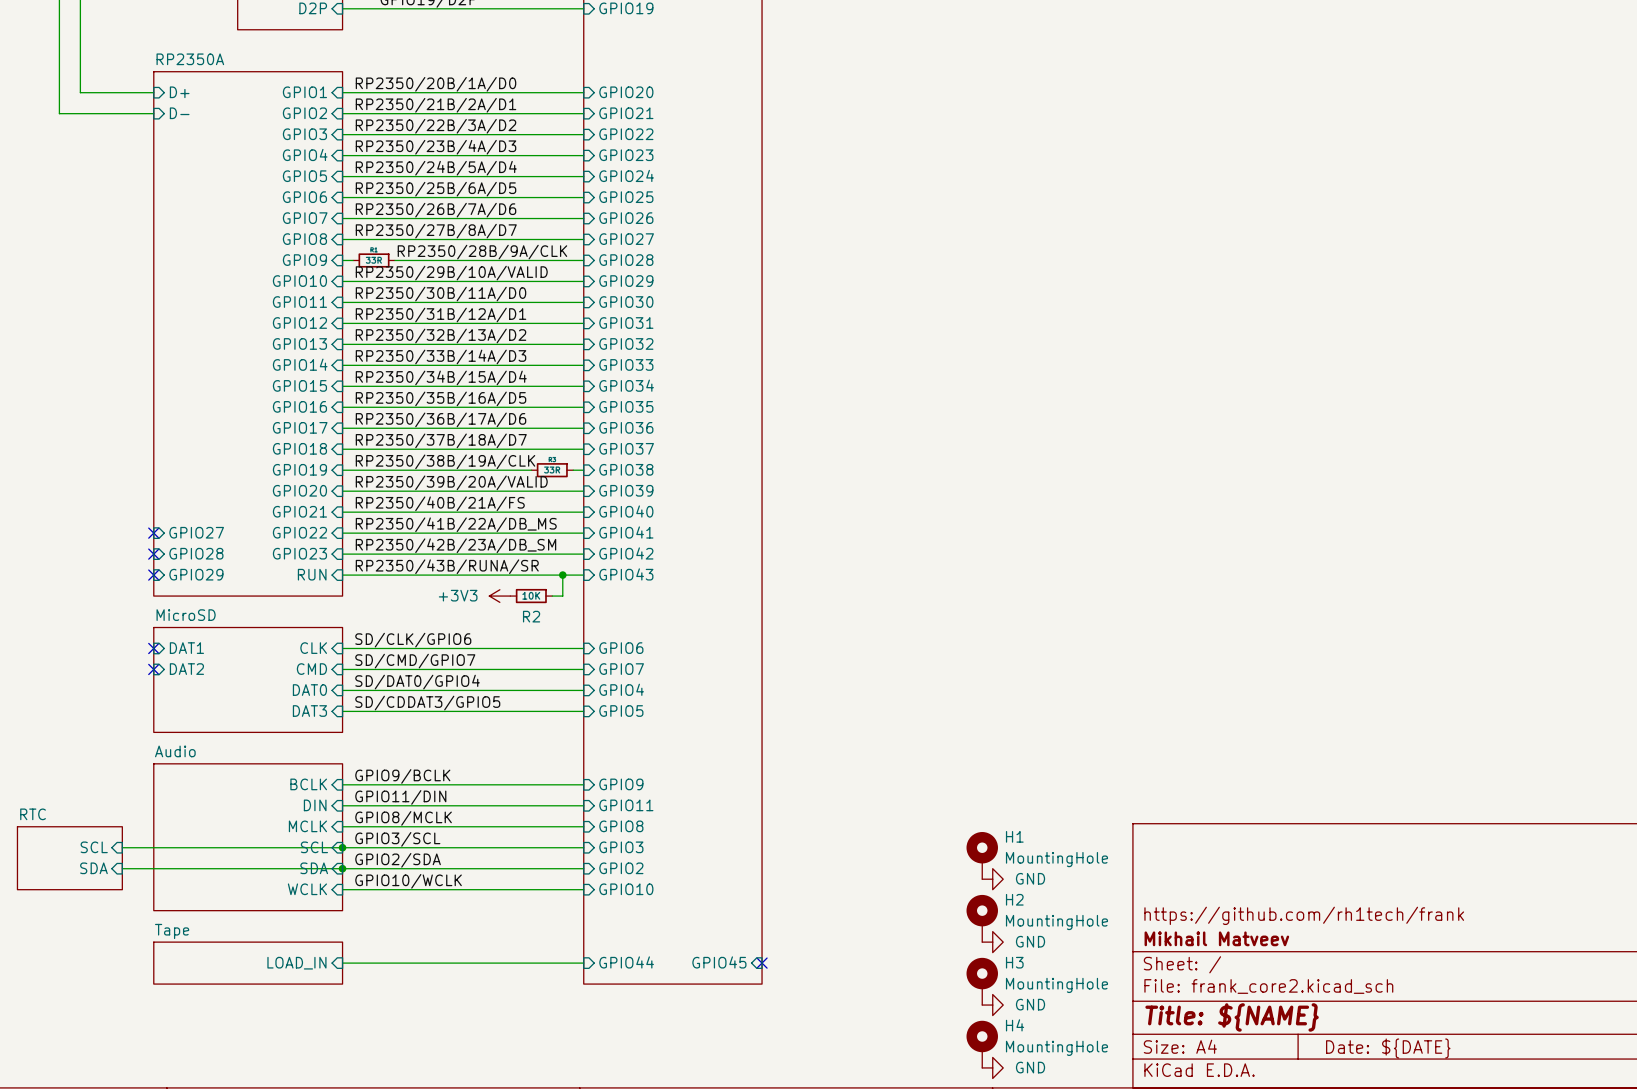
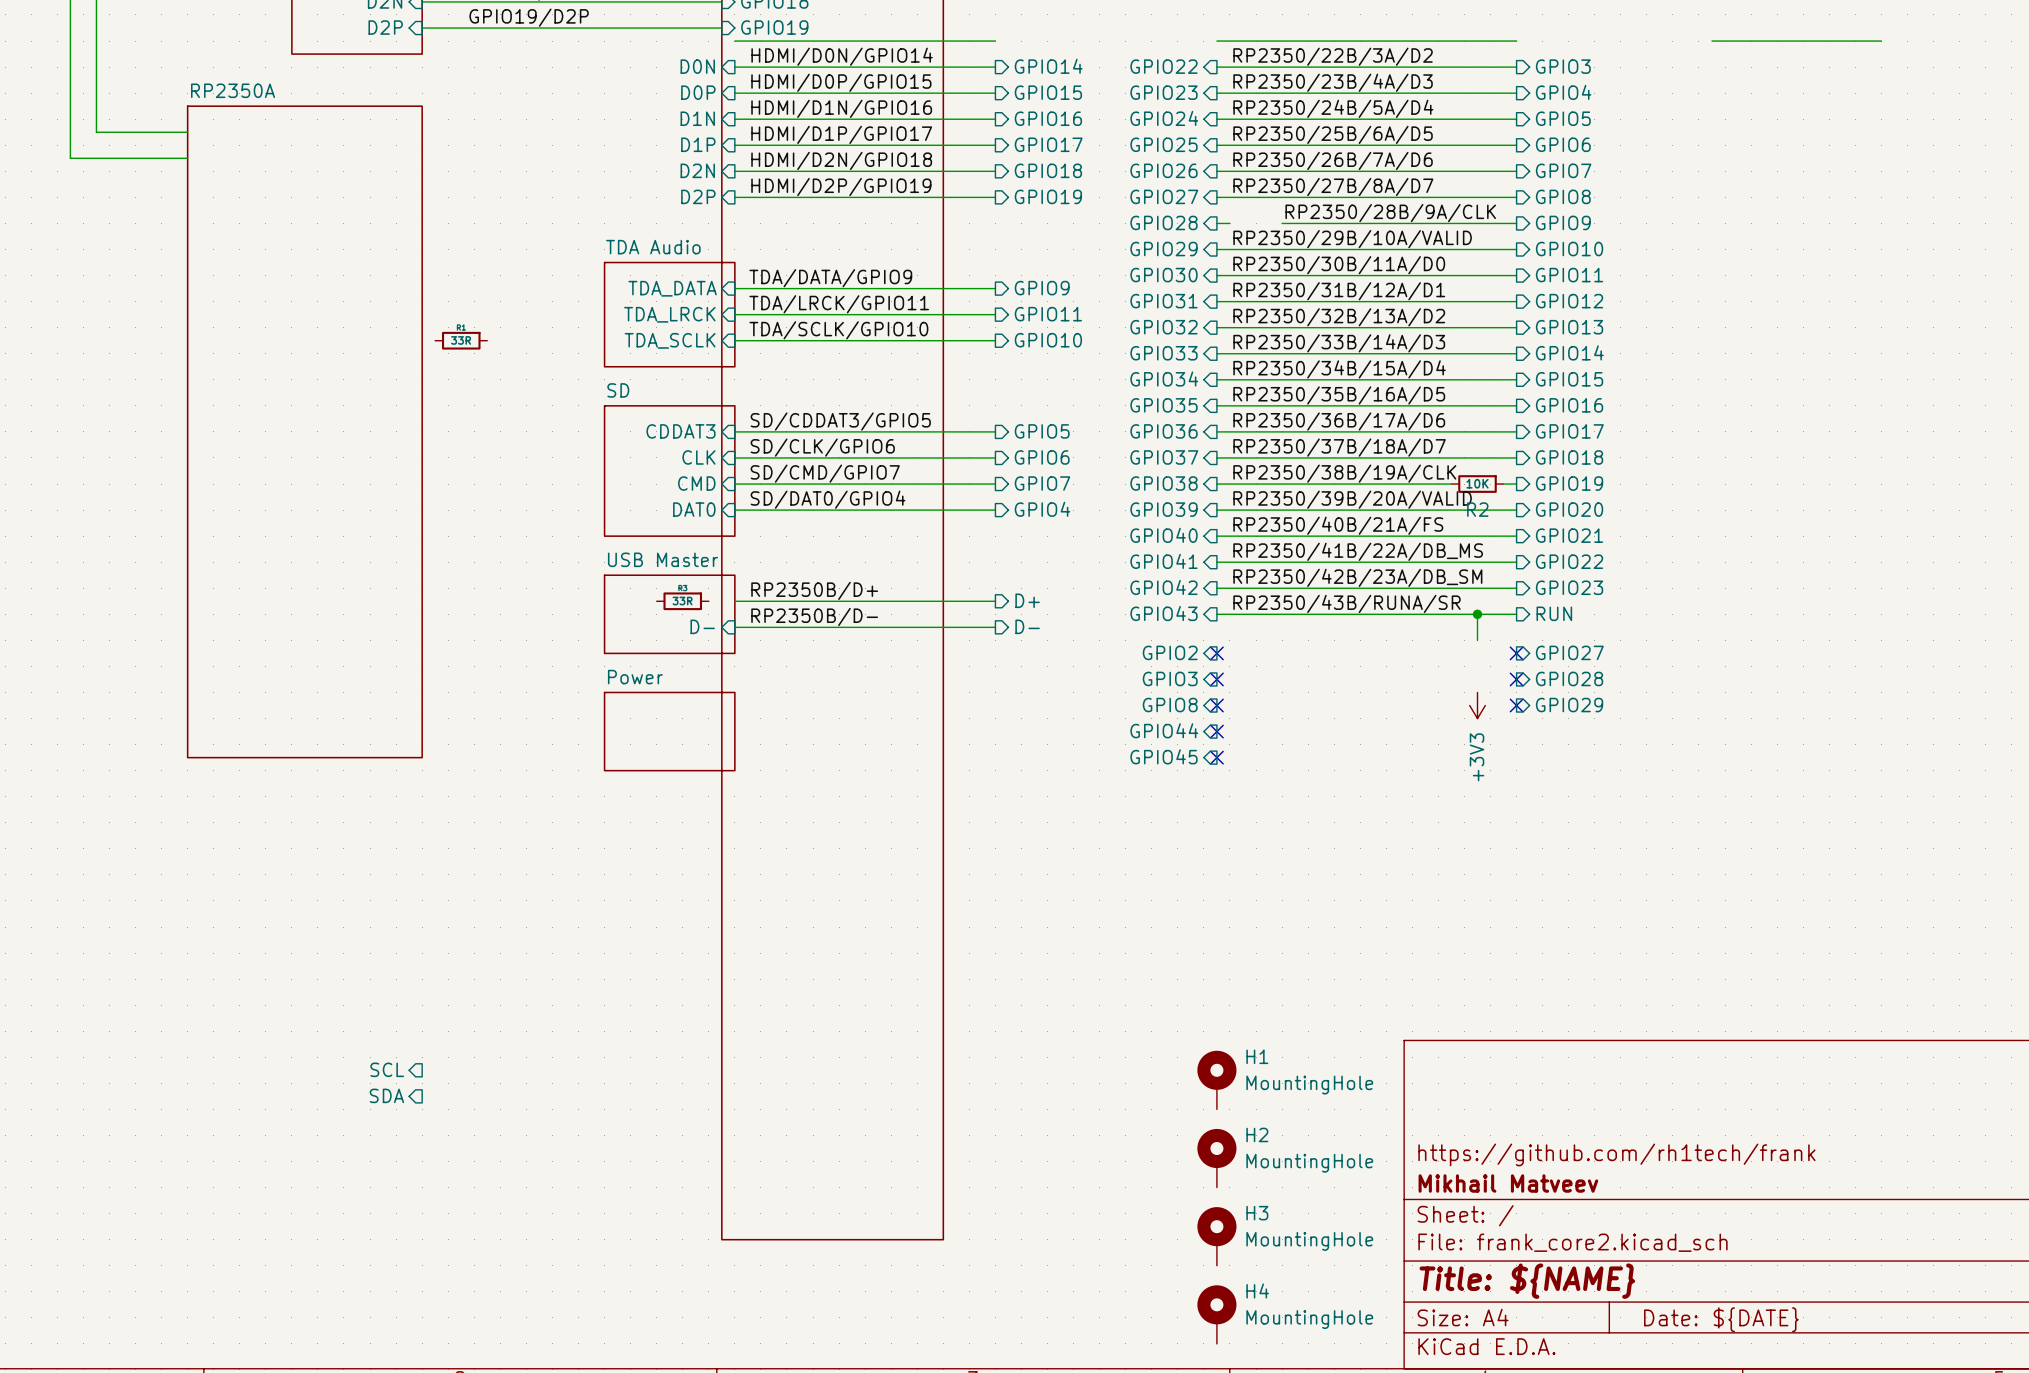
wire: none -> (734, 41) (995, 41)
wire: none -> (1216, 41) (1516, 41)
wire: none -> (1712, 41) (1881, 41)
label: none -> HDMI/D0N/GPIO14 (842, 56)
label: none -> RP2350/22B/3A/D2 (1333, 56)
sheet pin: none -> D0N (697, 66)
sheet pin: none -> GPIO14 (1048, 66)
sheet pin: none -> GPIO22 (1163, 66)
sheet pin: none -> GPIO3 (1563, 66)
wire: none -> (734, 67) (995, 67)
wire: none -> (1216, 67) (1516, 67)
label: none -> HDMI/D0P/GPIO15 (841, 82)
label: none -> RP2350/23B/4A/D3 (1333, 82)
sheet pin: none -> D0P (698, 92)
sheet pin: none -> GPIO15 (1048, 92)
sheet pin: none -> GPIO23 (1163, 92)
sheet pin: none -> GPIO4 (1563, 92)
wire: none -> (734, 93) (995, 93)
wire: none -> (1216, 93) (1516, 93)
label: none -> HDMI/D1N/GPIO16 (841, 108)
label: none -> RP2350/24B/5A/D4 (1333, 108)
sheet pin: none -> D1N (697, 118)
sheet pin: none -> GPIO16 (1048, 118)
sheet pin: none -> GPIO24 (1164, 118)
sheet pin: none -> GPIO5 (1563, 118)
wire: none -> (734, 119) (995, 119)
wire: none -> (1216, 119) (1516, 119)
label: RP2350/20B/1A/D0 (436, 84) -> none
sheet pin: D+ (179, 92) -> none
sheet pin: GPIO1 (304, 92) -> none
wire: (342, 92) (583, 92) -> none
sheet pin: GPIO20 (626, 92) -> none
label: none -> HDMI/D1P/GPIO17 (841, 134)
label: none -> RP2350/25B/6A/D5 (1333, 134)
sheet pin: none -> D1P (698, 144)
sheet pin: none -> GPIO17 (1048, 144)
sheet pin: none -> GPIO25 (1163, 144)
sheet pin: none -> GPIO6 (1563, 144)
wire: none -> (734, 145) (995, 145)
wire: none -> (1216, 145) (1516, 145)
label: RP2350/21B/2A/D1 (436, 105) -> none
sheet pin: D- (179, 113) -> none
sheet pin: GPIO2 (304, 113) -> none
wire: (342, 113) (583, 113) -> none
sheet pin: GPIO21 (626, 113) -> none
label: none -> HDMI/D2N/GPIO18 (841, 160)
label: none -> RP2350/26B/7A/D6 (1333, 160)
sheet pin: none -> D2N (697, 170)
sheet pin: none -> GPIO18 (1048, 170)
sheet pin: none -> GPIO26 (1163, 170)
sheet pin: none -> GPIO7 (1563, 170)
wire: none -> (734, 171) (995, 171)
wire: none -> (1216, 171) (1516, 171)
label: RP2350/22B/3A/D2 (436, 126) -> none
sheet pin: GPIO3 (304, 134) -> none
wire: (342, 134) (583, 134) -> none
sheet pin: GPIO22 (626, 134) -> none
label: none -> HDMI/D2P/GPIO19 (841, 187)
label: none -> RP2350/27B/8A/D7 (1333, 187)
sheet pin: none -> D2P (698, 196)
sheet pin: none -> GPIO19 (1048, 196)
sheet pin: none -> GPIO27 (1164, 196)
sheet pin: none -> GPIO8 (1563, 196)
wire: none -> (734, 197) (995, 197)
wire: none -> (1216, 197) (1516, 197)
label: RP2350/23B/4A/D3 (436, 147) -> none
sheet pin: GPIO4 (305, 154) -> none
wire: (342, 155) (583, 155) -> none
sheet pin: GPIO23 (626, 155) -> none
label: none -> RP2350/28B/9A/CLK (1390, 213)
sheet pin: none -> GPIO28 (1163, 222)
sheet pin: none -> GPIO9 (1563, 222)
wire: none -> (1216, 223) (1229, 223)
wire: none -> (1282, 223) (1516, 223)
label: RP2350/24B/5A/D4 (436, 168) -> none
sheet pin: GPIO24 (626, 175) -> none
sheet pin: GPIO5 (304, 176) -> none
wire: (342, 176) (583, 176) -> none
label: none -> RP2350/29B/10A/VALID (1352, 239)
sheet pin: none -> GPIO29 (1163, 249)
sheet pin: none -> GPIO10 (1569, 249)
wire: none -> (1216, 249) (1516, 249)
label: RP2350/25B/6A/D5 (436, 189) -> none
sheet pin: GPIO6 (304, 197) -> none
wire: (342, 197) (583, 197) -> none
sheet pin: GPIO25 (626, 197) -> none
label: none -> RP2350/30B/11A/D0 (1339, 265)
sheet pin: none -> GPIO30 (1163, 275)
sheet pin: none -> GPIO11 (1569, 275)
wire: none -> (1216, 275) (1516, 275)
label: RP2350/26B/7A/D6 (436, 210) -> none
label: none -> TDA/DATA/GPIO9 (830, 278)
sheet pin: GPIO7 (305, 218) -> none
wire: (342, 218) (583, 218) -> none
sheet pin: none -> TDA_DATA (672, 288)
wire: none -> (734, 288) (995, 288)
sheet pin: GPIO26 (626, 218) -> none
sheet pin: none -> GPIO9 (1042, 288)
label: none -> RP2350/31B/12A/D1 (1339, 291)
sheet pin: none -> GPIO31 (1163, 301)
sheet pin: none -> GPIO12 (1569, 301)
wire: none -> (1216, 301) (1516, 301)
label: RP2350/27B/8A/D7 (436, 231) -> none
label: none -> TDA/LRCK/GPIO11 (839, 304)
sheet pin: GPIO8 (304, 239) -> none
wire: (342, 239) (583, 239) -> none
sheet TDA Audio: none -> (669, 314)
sheet pin: none -> TDA_LRCK (669, 314)
wire: none -> (734, 314) (995, 314)
sheet pin: GPIO27 (626, 239) -> none
sheet pin: none -> GPIO11 (1048, 314)
label: none -> RP2350/32B/13A/D2 (1339, 317)
sheet pin: none -> GPIO32 (1163, 327)
wire: none -> (1216, 327) (1516, 327)
sheet pin: none -> GPIO13 (1569, 327)
label: RP2350/28B/9A/CLK (482, 252) -> none
label: none -> TDA/SCLK/GPIO10 (838, 330)
sheet pin: GPIO9 (304, 260) -> none
wire: (342, 260) (353, 260) -> none
wire: (394, 260) (583, 260) -> none
sheet pin: none -> TDA_SCLK (670, 340)
wire: none -> (734, 340) (995, 340)
sheet pin: GPIO28 (626, 260) -> none
sheet pin: none -> GPIO10 (1048, 340)
label: none -> RP2350/33B/14A/D3 (1339, 343)
sheet pin: none -> GPIO33 (1163, 353)
wire: none -> (1216, 353) (1516, 353)
sheet pin: none -> GPIO14 (1569, 352)
label: RP2350/29B/10A/VALID (451, 273) -> none
sheet pin: GPIO10 (299, 281) -> none
wire: (342, 281) (583, 281) -> none
sheet pin: GPIO29 (626, 281) -> none
label: none -> RP2350/34B/15A/D4 (1339, 369)
sheet pin: none -> GPIO34 (1164, 379)
wire: none -> (1216, 379) (1516, 379)
sheet pin: none -> GPIO15 (1569, 379)
label: RP2350/30B/11A/D0 (441, 294) -> none
sheet pin: GPIO11 (299, 302) -> none
wire: (342, 302) (583, 302) -> none
sheet pin: GPIO30 (626, 302) -> none
label: none -> RP2350/35B/16A/D5 (1339, 395)
sheet pin: none -> GPIO35 (1163, 405)
wire: none -> (1216, 405) (1516, 405)
sheet pin: none -> GPIO16 (1569, 405)
label: RP2350/31B/12A/D1 (441, 315) -> none
sheet pin: GPIO12 (299, 323) -> none
wire: (342, 323) (583, 323) -> none
sheet pin: GPIO31 (626, 323) -> none
label: none -> SD/CDDAT3/GPIO5 (840, 421)
label: none -> RP2350/36B/17A/D6 (1339, 421)
sheet pin: none -> CDDAT3 (680, 431)
wire: none -> (734, 431) (995, 431)
sheet pin: none -> GPIO5 (1042, 431)
sheet pin: none -> GPIO36 (1163, 431)
wire: none -> (1216, 431) (1516, 431)
sheet pin: none -> GPIO17 (1569, 431)
label: RP2350/32B/13A/D2 (441, 336) -> none
sheet pin: GPIO13 (299, 343) -> none
sheet pin: GPIO32 (626, 343) -> none
wire: (342, 344) (583, 344) -> none
label: none -> SD/CLK/GPIO6 (822, 447)
label: none -> RP2350/37B/18A/D7 (1339, 447)
sheet pin: none -> CLK (698, 457)
wire: none -> (734, 457) (995, 457)
sheet pin: none -> GPIO6 (1042, 457)
sheet pin: none -> GPIO37 (1164, 457)
wire: none -> (1216, 457) (1516, 457)
sheet pin: none -> GPIO18 (1569, 457)
label: RP2350/33B/14A/D3 (441, 356) -> none
sheet pin: GPIO14 (300, 364) -> none
sheet pin: GPIO33 (626, 364) -> none
wire: (342, 365) (583, 365) -> none
sheet SD: none -> (669, 470)
label: none -> SD/CMD/GPIO7 (825, 473)
label: none -> RP2350/38B/19A/CLK (1344, 473)
sheet pin: none -> CMD (696, 483)
wire: none -> (734, 484) (995, 484)
sheet pin: none -> GPIO7 (1042, 483)
sheet pin: none -> GPIO38 (1163, 483)
wire: none -> (1216, 484) (1451, 484)
wire: none -> (1503, 484) (1516, 484)
sheet pin: none -> GPIO19 (1569, 483)
label: RP2350/34B/15A/D4 (441, 377) -> none
sheet pin: GPIO15 (299, 385) -> none
sheet pin: GPIO34 (626, 385) -> none
wire: (342, 386) (583, 386) -> none
label: none -> SD/DAT0/GPIO4 (828, 499)
label: none -> RP2350/39B/20A/VALID (1352, 499)
sheet pin: none -> DAT0 (694, 509)
wire: none -> (734, 510) (995, 510)
sheet pin: none -> GPIO4 (1042, 509)
sheet pin: none -> GPIO39 (1163, 509)
wire: none -> (1216, 510) (1516, 510)
sheet pin: none -> GPIO20 (1569, 509)
label: RP2350/35B/16A/D5 (441, 398) -> none
sheet pin: GPIO16 (299, 406) -> none
sheet pin: GPIO35 (626, 406) -> none
wire: (342, 407) (583, 407) -> none
label: none -> RP2350/40B/21A/FS (1338, 525)
sheet pin: none -> GPIO40 (1163, 535)
wire: none -> (1216, 536) (1516, 536)
sheet pin: none -> GPIO21 (1569, 535)
label: RP2350/36B/17A/D6 (441, 419) -> none
sheet pin: GPIO17 (300, 427) -> none
sheet pin: GPIO36 (626, 427) -> none
wire: (342, 428) (583, 428) -> none
label: none -> RP2350/41B/22A/DB_MS (1358, 551)
sheet pin: none -> GPIO41 (1163, 561)
wire: none -> (1216, 562) (1516, 562)
sheet pin: none -> GPIO22 (1569, 561)
label: RP2350/37B/18A/D7 (441, 440) -> none
sheet pin: GPIO18 (299, 448) -> none
sheet pin: GPIO37 (626, 448) -> none
wire: (342, 449) (583, 449) -> none
label: none -> RP2350/42B/23A/DB_SM (1357, 577)
sheet pin: none -> GPIO42 (1163, 587)
wire: none -> (1216, 588) (1516, 588)
sheet pin: none -> GPIO23 (1569, 587)
label: RP2350/38B/19A/CLK (445, 461) -> none
label: none -> RP2350B/D+ (814, 590)
sheet pin: GPIO19 (299, 469) -> none
sheet pin: GPIO38 (626, 469) -> none
sheet pin: none -> D+ (1027, 600)
wire: (342, 470) (531, 470) -> none
wire: (573, 470) (583, 470) -> none
wire: none -> (734, 601) (995, 601)
label: none -> RP2350/43B/RUNA/SR (1347, 603)
sheet USB Master: none -> (669, 614)
sheet pin: none -> GPIO43 (1163, 613)
wire: none -> (1216, 614) (1516, 614)
wire: none -> (1477, 614) (1477, 640)
junction: none -> (1477, 614)
sheet pin: none -> RUN (1554, 613)
label: RP2350/39B/20A/VALID (451, 482) -> none
label: none -> RP2350B/D- (814, 616)
sheet pin: GPIO20 (299, 490) -> none
sheet pin: none -> D- (702, 626)
sheet pin: GPIO39 (626, 490) -> none
sheet pin: none -> D- (1027, 626)
wire: (342, 491) (583, 491) -> none
wire: none -> (734, 627) (995, 627)
label: RP2350/40B/21A/FS (440, 503) -> none
sheet pin: GPIO21 (299, 511) -> none
sheet pin: GPIO40 (626, 511) -> none
sheet pin: none -> GPIO2 (1170, 652)
sheet pin: none -> GPIO27 (1569, 652)
wire: (342, 512) (583, 512) -> none
no-connect mark: none -> (1216, 653)
no-connect mark: none -> (1516, 653)
label: RP2350/41B/22A/DB_MS (456, 524) -> none
sheet pin: GPIO27 (196, 532) -> none
sheet pin: GPIO22 (299, 532) -> none
sheet pin: GPIO41 (626, 532) -> none
sheet pin: none -> GPIO3 (1170, 678)
sheet pin: none -> GPIO28 (1569, 678)
no-connect mark: (153, 533) -> none
wire: (342, 533) (583, 533) -> none
no-connect mark: none -> (1216, 679)
no-connect mark: none -> (1516, 679)
label: RP2350/42B/23A/DB_SM (455, 545) -> none
sheet pin: GPIO28 (196, 553) -> none
sheet pin: GPIO23 (299, 553) -> none
sheet pin: GPIO42 (626, 553) -> none
sheet pin: none -> GPIO8 (1170, 705)
sheet pin: none -> GPIO29 (1569, 705)
no-connect mark: (153, 554) -> none
wire: (342, 554) (583, 554) -> none
no-connect mark: none -> (1216, 705)
power symbol: none -> +3V3 (1477, 705)
no-connect mark: none -> (1516, 705)
label: RP2350/43B/RUNA/SR (447, 566) -> none
sheet pin: GPIO29 (196, 574) -> none
sheet pin: RUN (312, 574) -> none
sheet pin: GPIO43 (626, 574) -> none
sheet pin: none -> GPIO44 (1164, 730)
no-connect mark: (153, 575) -> none
wire: (342, 575) (583, 575) -> none
sheet Power: none -> (669, 731)
wire: (562, 575) (562, 596) (552, 596) -> none
junction: (562, 575) -> none
no-connect mark: none -> (1216, 731)
sheet pin: none -> GPIO45 (1163, 756)
power symbol: +3V3 (499, 596) -> none
R2 position: (531, 596) -> (1477, 484)
no-connect mark: none -> (1216, 757)
label: SD/CLK/GPIO6 (413, 640) -> none
no-connect mark: (153, 648) -> none
sheet pin: DAT1 (186, 648) -> none
sheet pin: CLK (313, 648) -> none
wire: (342, 648) (583, 648) -> none
sheet pin: GPIO6 (621, 648) -> none
label: SD/CMD/GPIO7 (415, 661) -> none
no-connect mark: (153, 669) -> none
sheet pin: DAT2 (186, 669) -> none
sheet pin: CMD (311, 669) -> none
wire: (342, 669) (583, 669) -> none
sheet pin: GPIO7 (621, 669) -> none
sheet MicroSD: (248, 679) -> none
label: SD/DAT0/GPIO4 (417, 682) -> none
sheet pin: GPIO4 (621, 689) -> none
sheet pin: DAT0 (309, 690) -> none
wire: (342, 690) (583, 690) -> none
label: SD/CDDAT3/GPIO5 (427, 703) -> none
sheet pin: DAT3 (309, 711) -> none
wire: (342, 711) (583, 711) -> none
sheet pin: GPIO5 (621, 711) -> none
label: GPIO9/BCLK (402, 776) -> none
sheet pin: BCLK (308, 784) -> none
wire: (342, 784) (583, 784) -> none
sheet pin: GPIO9 (621, 784) -> none
label: GPIO11/DIN (400, 797) -> none
sheet pin: DIN (315, 805) -> none
wire: (342, 805) (583, 805) -> none
sheet pin: GPIO11 (626, 805) -> none
label: GPIO8/MCLK (403, 818) -> none
sheet pin: MCLK (307, 826) -> none
wire: (342, 826) (583, 826) -> none
sheet pin: GPIO8 (621, 826) -> none
sheet Audio: (248, 837) -> none
label: GPIO3/SCL (397, 839) -> none
sheet pin: SCL (94, 847) -> none
wire: (122, 847) (583, 847) -> none
junction: (342, 847) -> none
sheet pin: GPIO3 (621, 847) -> none
sheet RTC: (69, 858) -> none
label: GPIO2/SDA (398, 860) -> none
sheet pin: SDA (93, 868) -> none
wire: (122, 868) (583, 868) -> none
junction: (342, 868) -> none
sheet pin: GPIO2 (621, 868) -> none
power symbol: GND (992, 879) -> none
label: GPIO10/WCLK (408, 881) -> none
sheet pin: WCLK (307, 889) -> none
wire: (342, 889) (583, 889) -> none
sheet pin: GPIO10 (626, 889) -> none
power symbol: GND (992, 942) -> none
sheet pin: GPIO44 (626, 962) -> none
sheet pin: GPIO45 (719, 962) -> none
sheet Tape: (248, 963) -> none
sheet pin: LOAD_IN (296, 963) -> none
wire: (342, 963) (583, 963) -> none
no-connect mark: (762, 963) -> none
power symbol: GND (992, 1005) -> none
power symbol: GND (992, 1067) -> none

